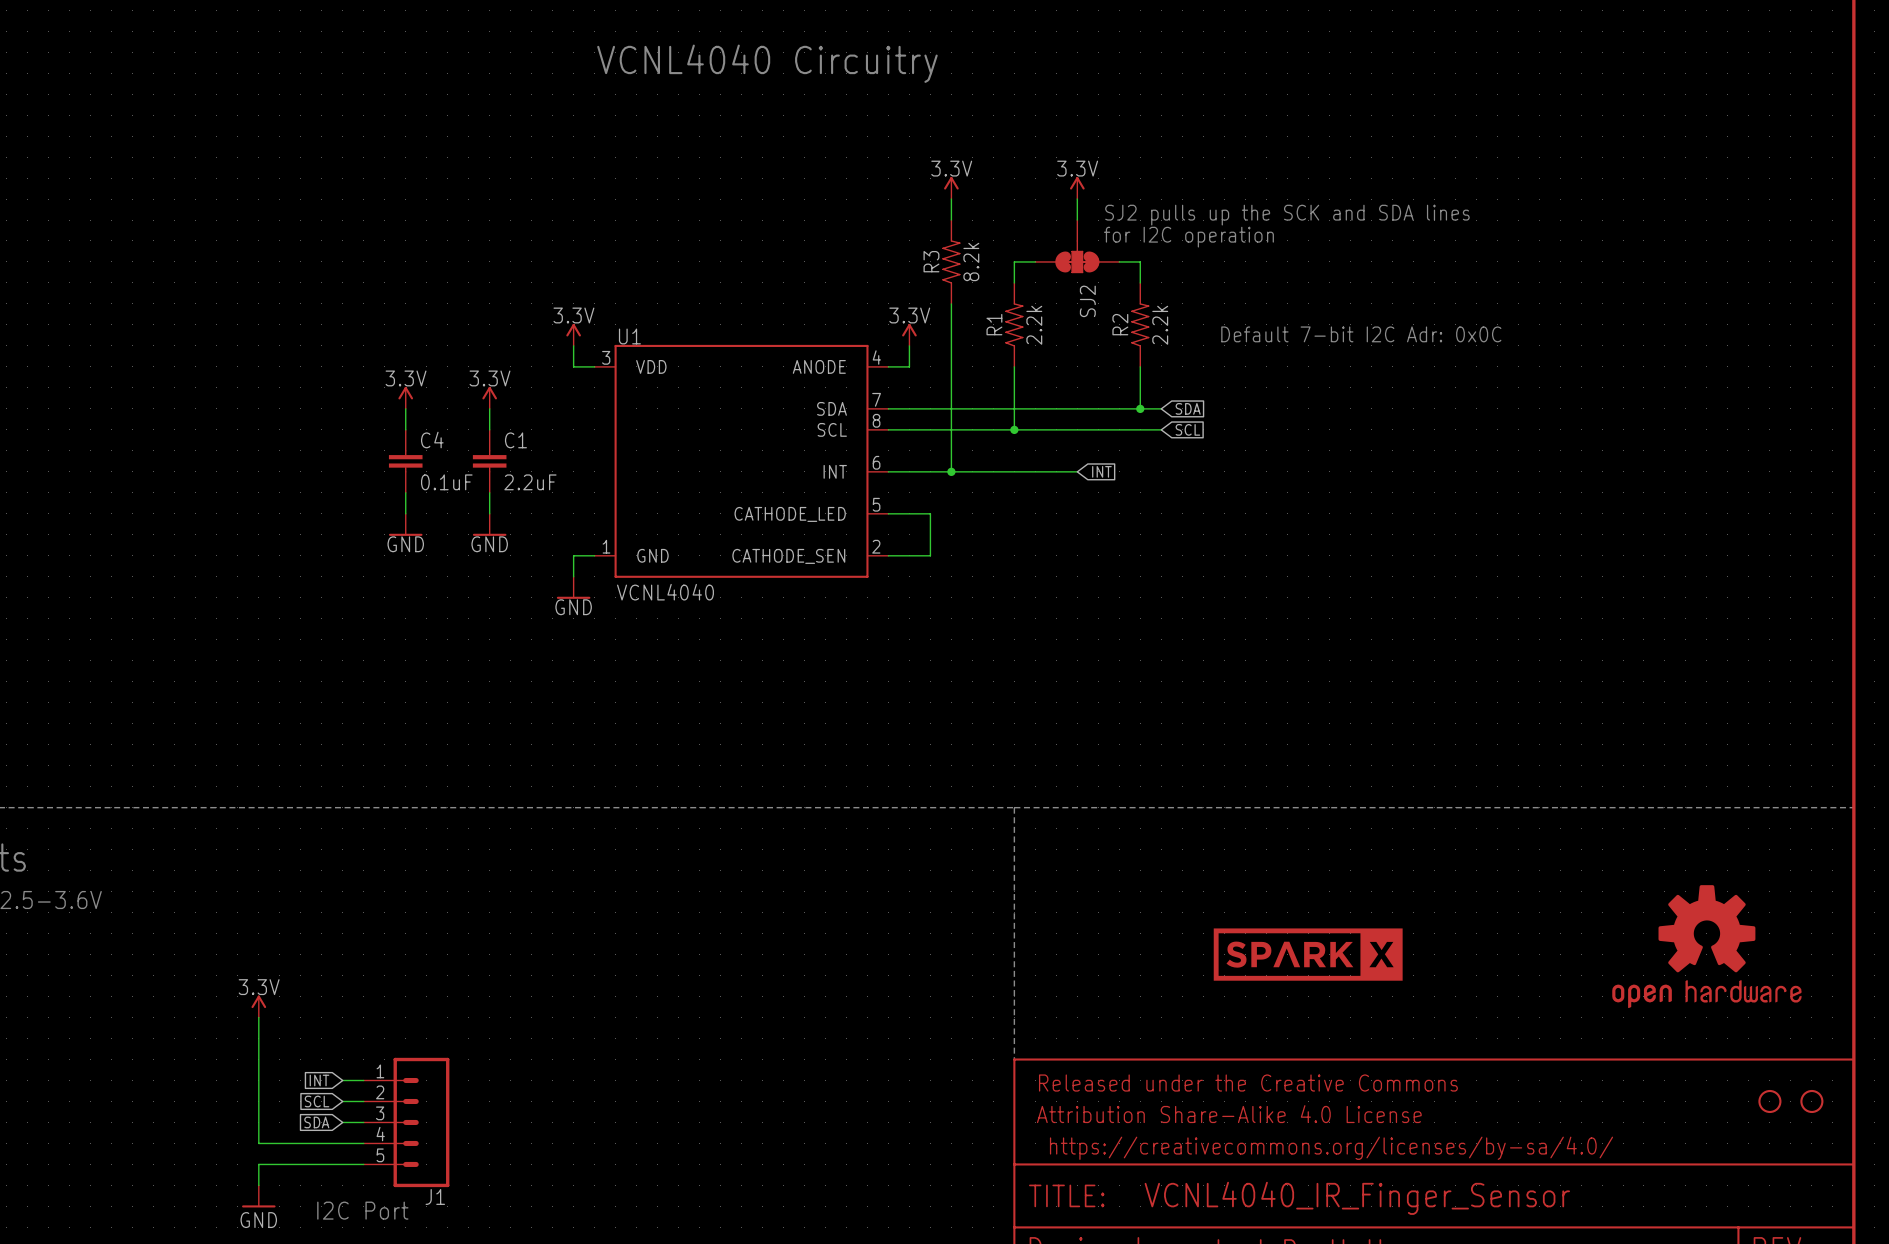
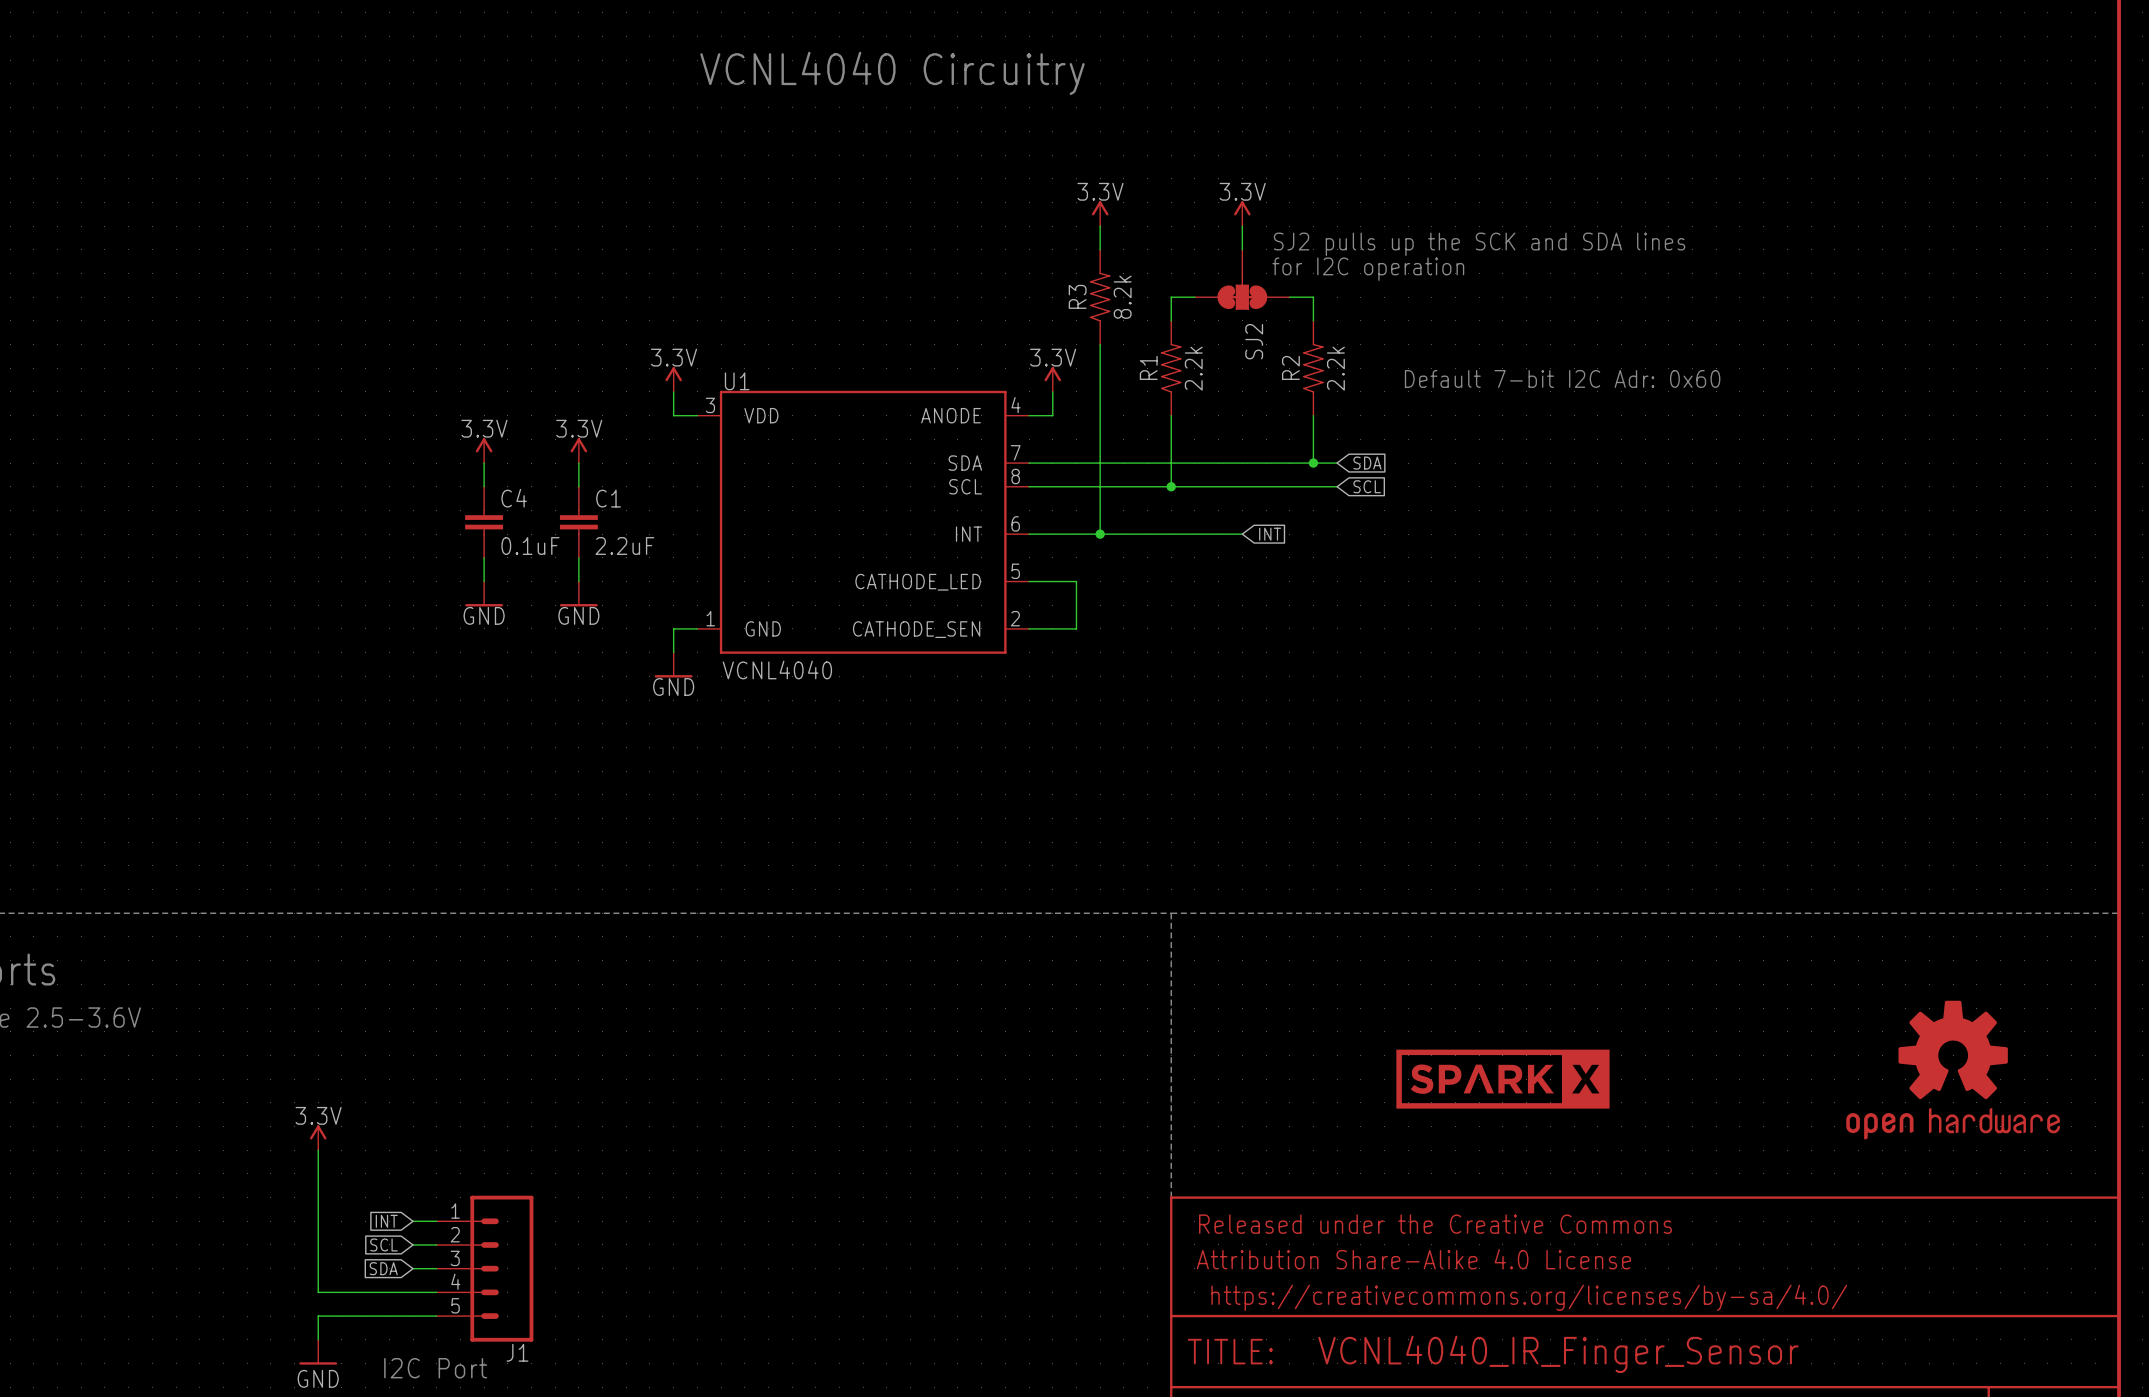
text: Default 7-bit I2C Adr: 0x0C (1361, 334) -> Default 7-bit I2C Adr: 0x60 (1562, 378)
part: (1769, 1101) -> none
part: (1811, 1101) -> none

